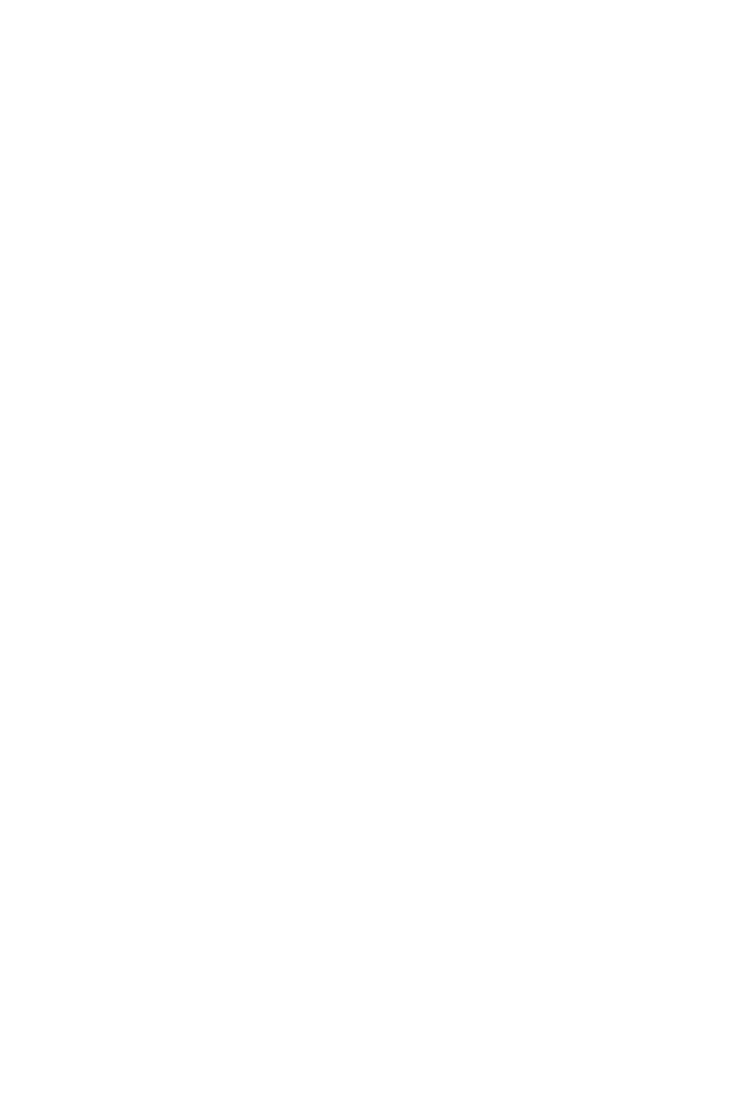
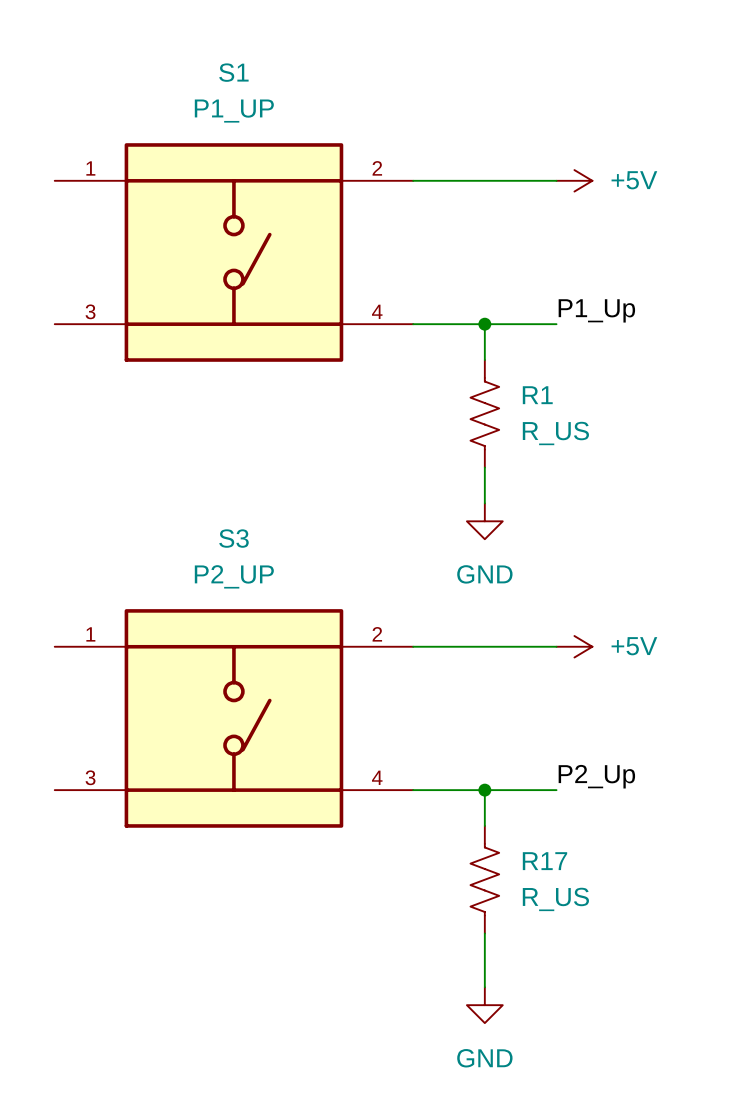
wire: none -> (413, 180) (556, 180)
power symbol: none -> +5V (574, 180)
S1: none -> P1_UP (233, 252)
label: none -> P1_Up (596, 310)
wire: none -> (413, 324) (556, 324)
wire: none -> (484, 324) (484, 360)
junction: none -> (484, 324)
R1: none -> R_US (484, 413)
wire: none -> (484, 467) (484, 503)
power symbol: none -> GND (484, 521)
wire: none -> (413, 646) (556, 646)
power symbol: none -> +5V (574, 646)
S3: none -> P2_UP (233, 718)
label: none -> P2_Up (596, 776)
wire: none -> (413, 790) (556, 790)
wire: none -> (484, 790) (484, 825)
junction: none -> (484, 790)
R17: none -> R_US (484, 879)
wire: none -> (484, 933) (484, 987)
power symbol: none -> GND (484, 1005)

